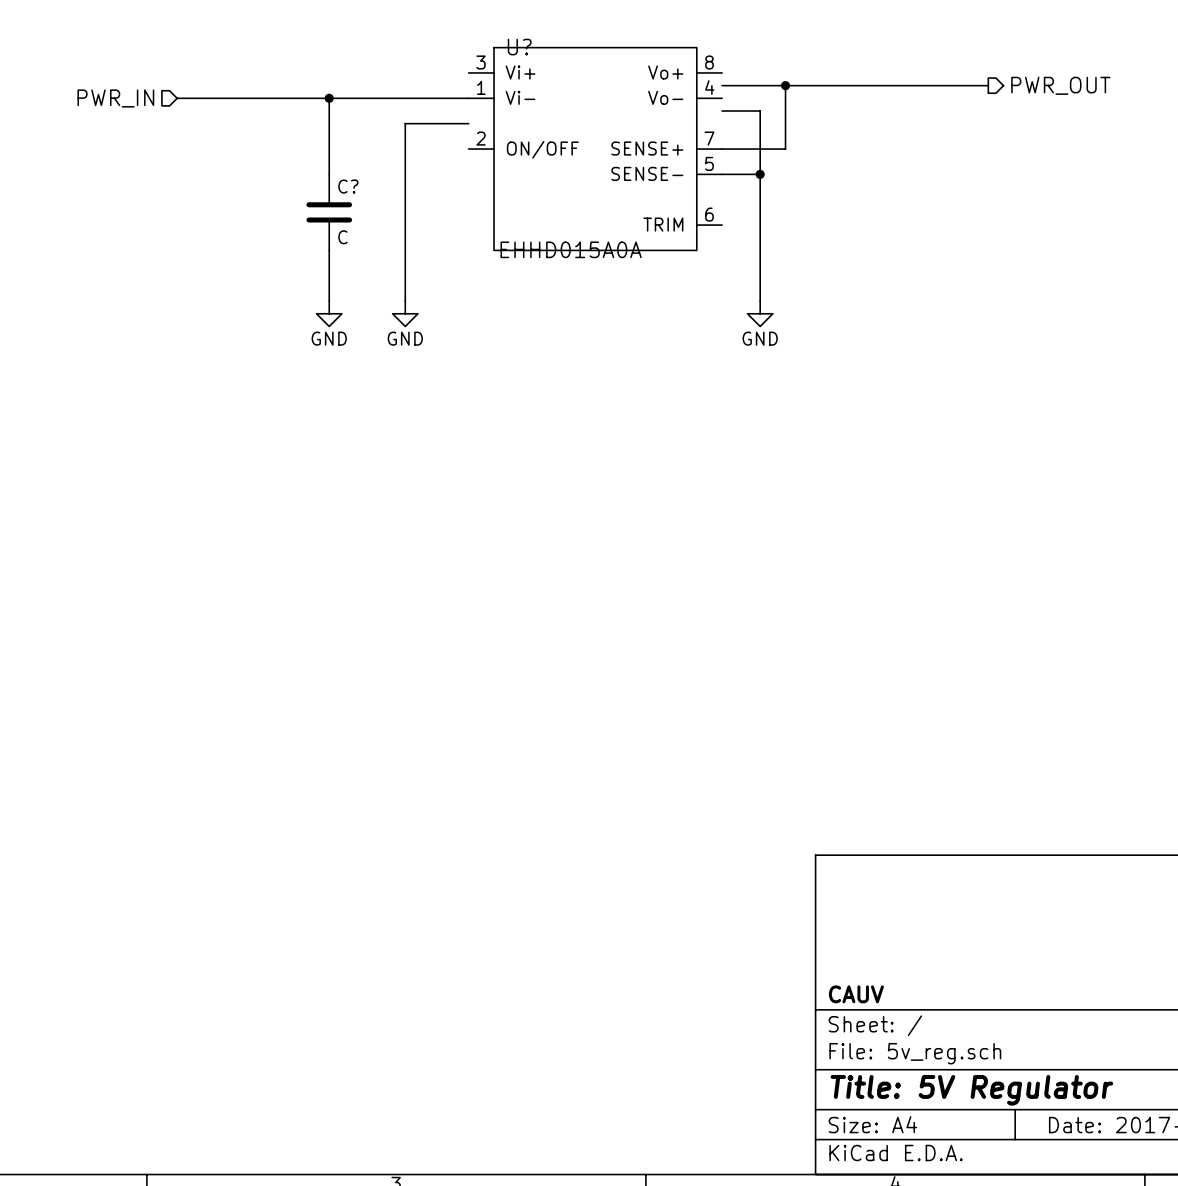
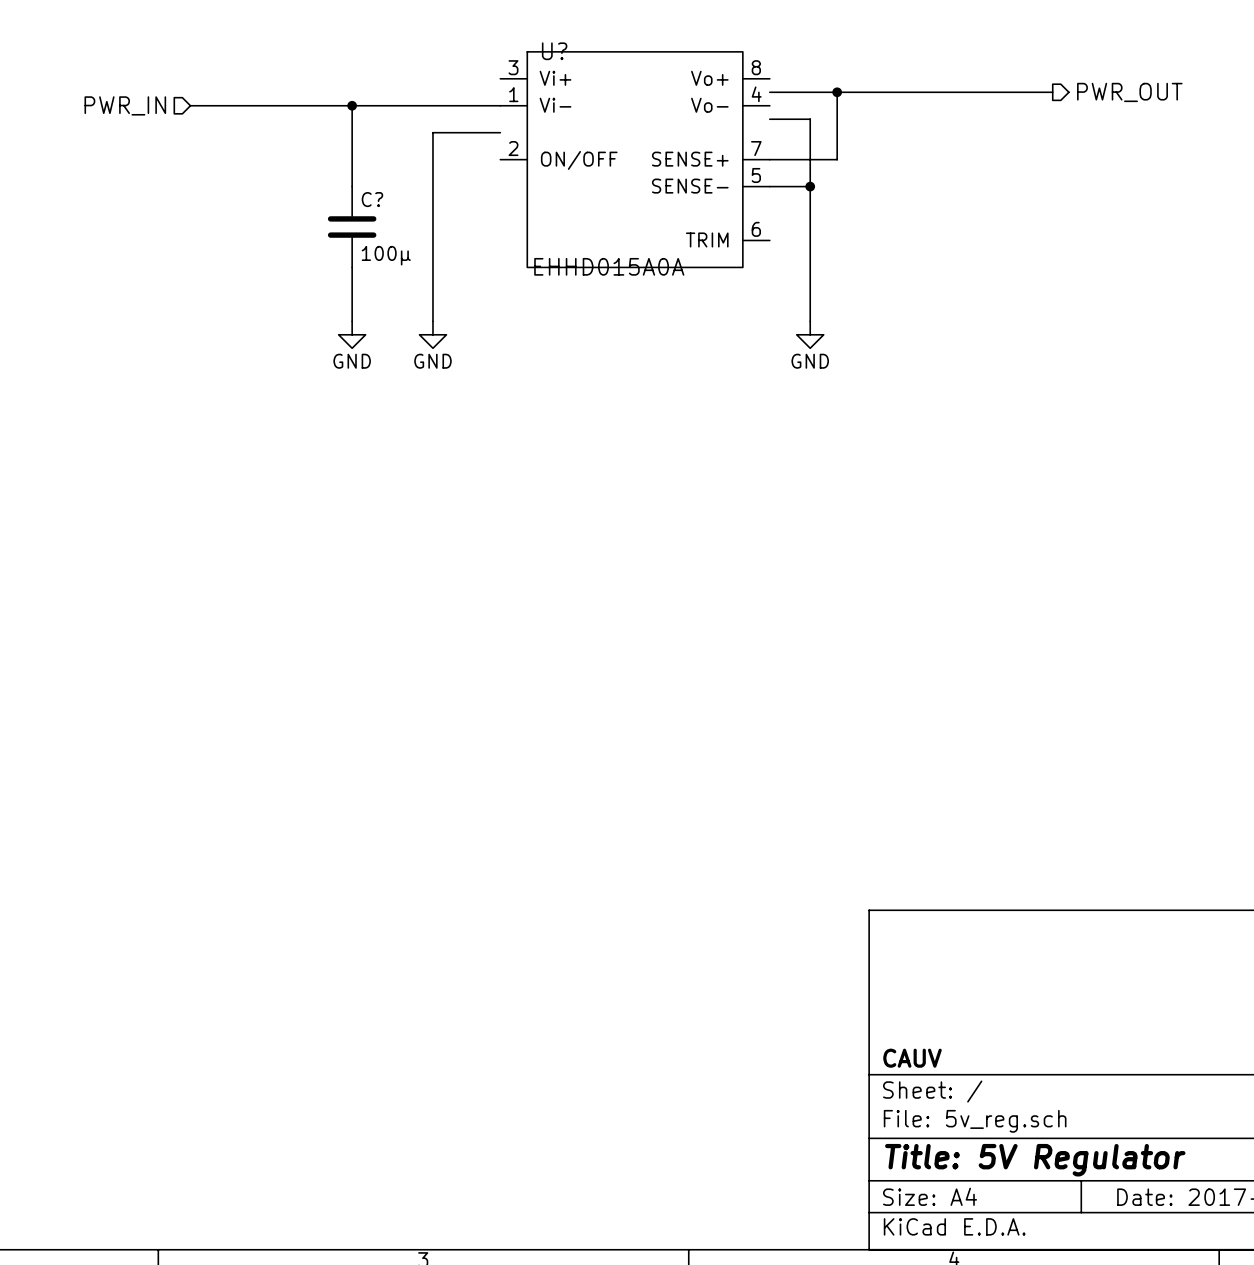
C? value: C (342, 237) -> 100μ (386, 255)

